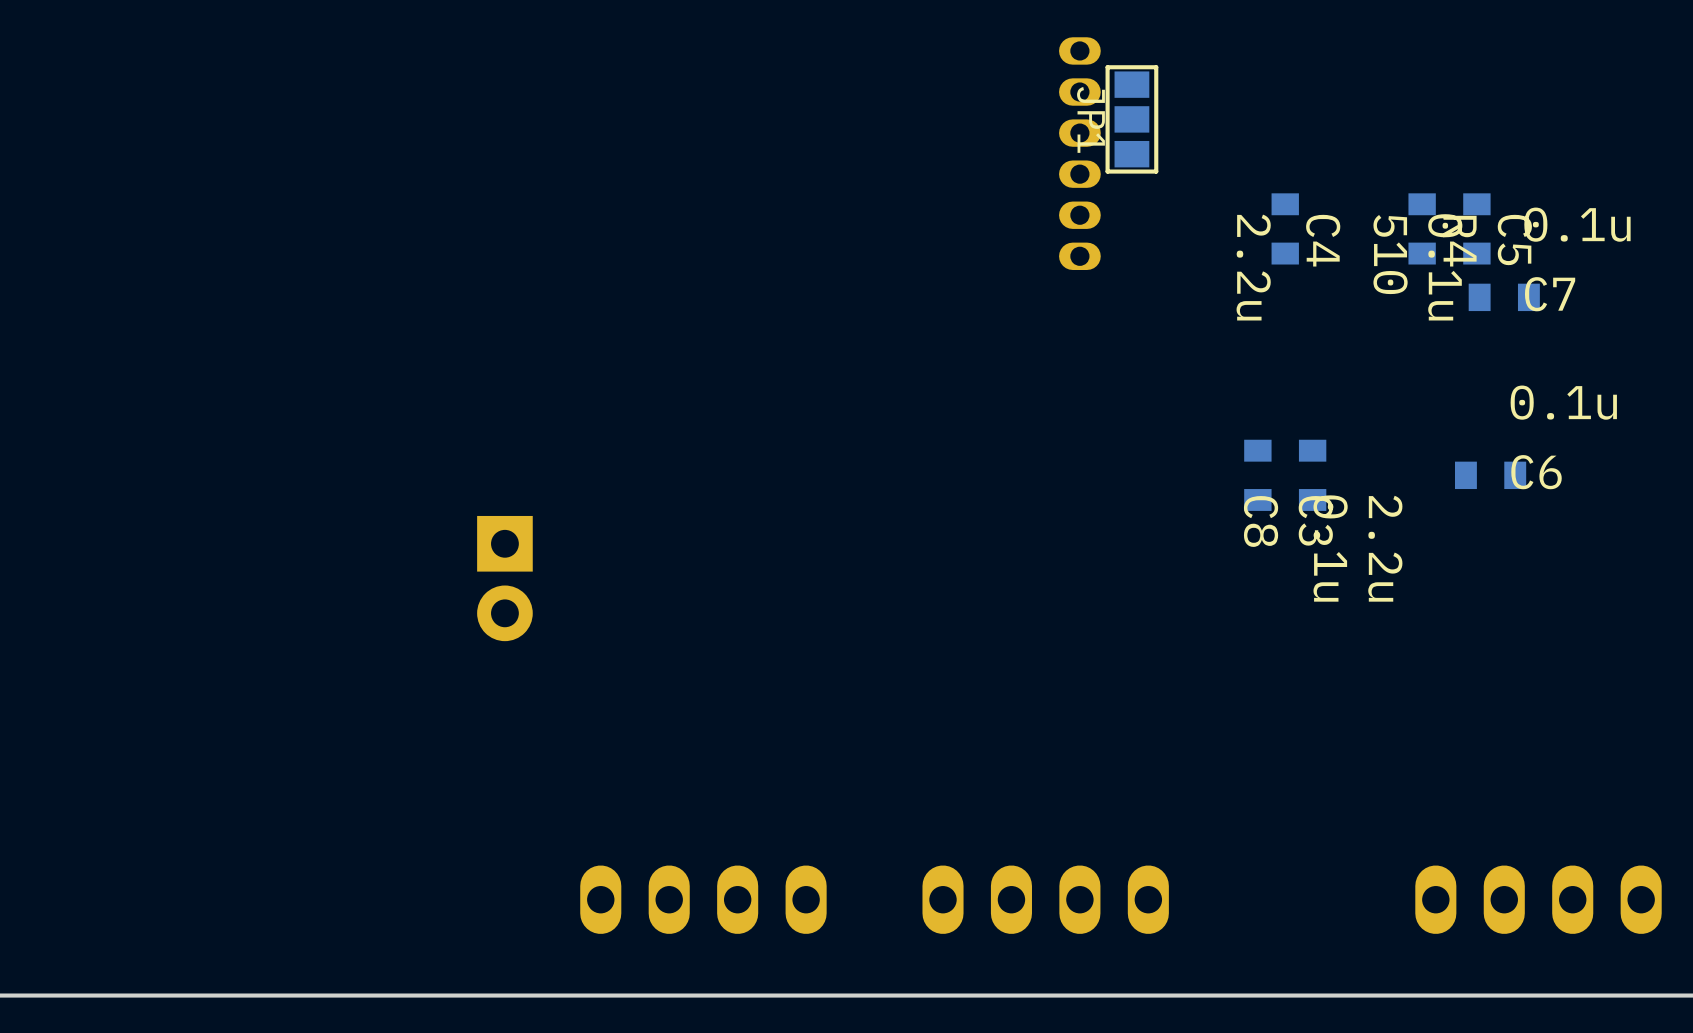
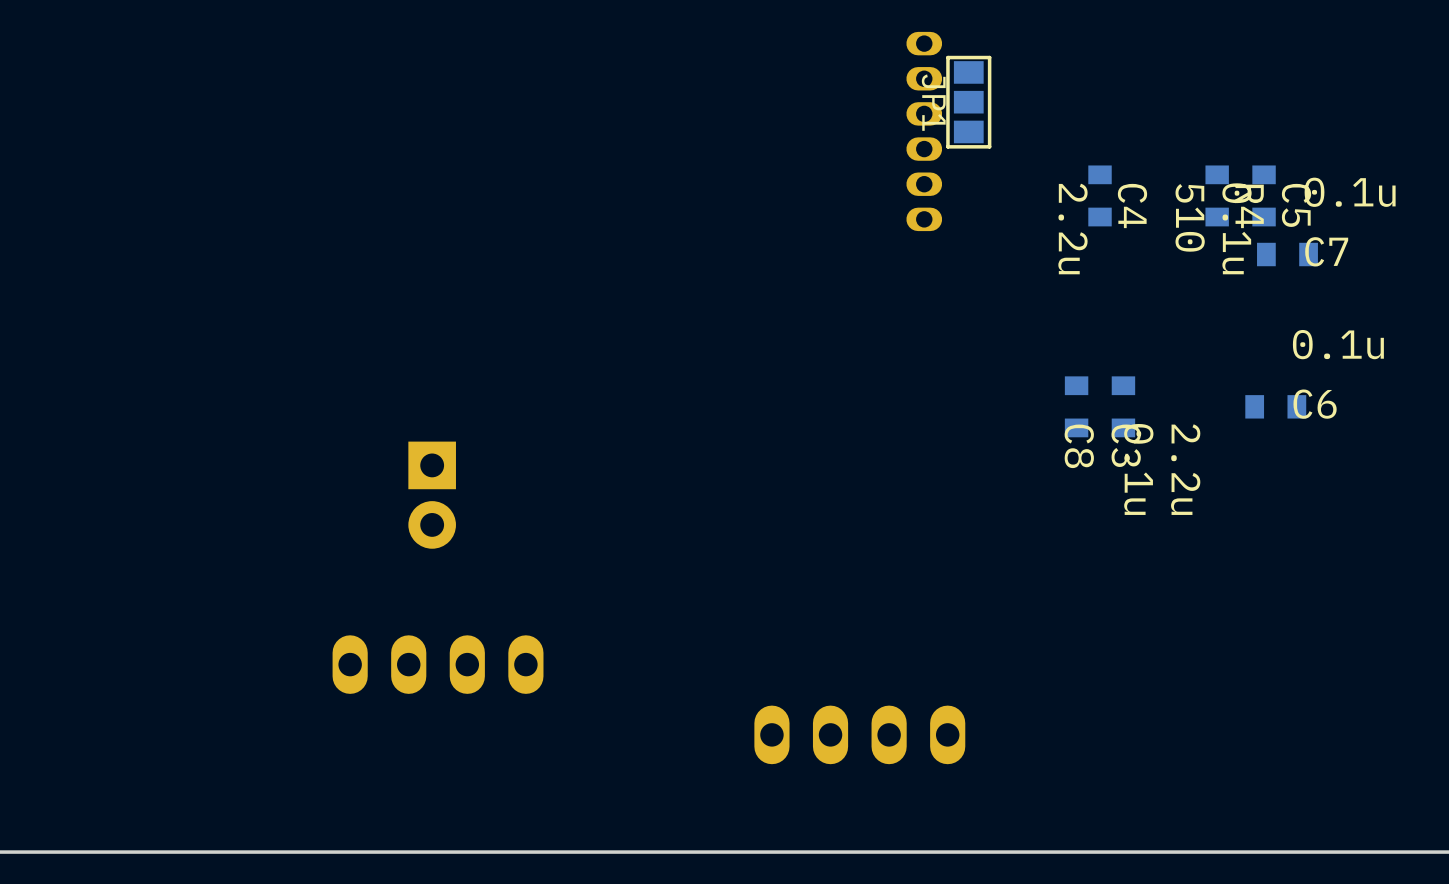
part: none -> (438, 664)
part: (703, 899) -> none
part position: (1045, 899) -> (859, 734)
part: (1538, 899) -> none

